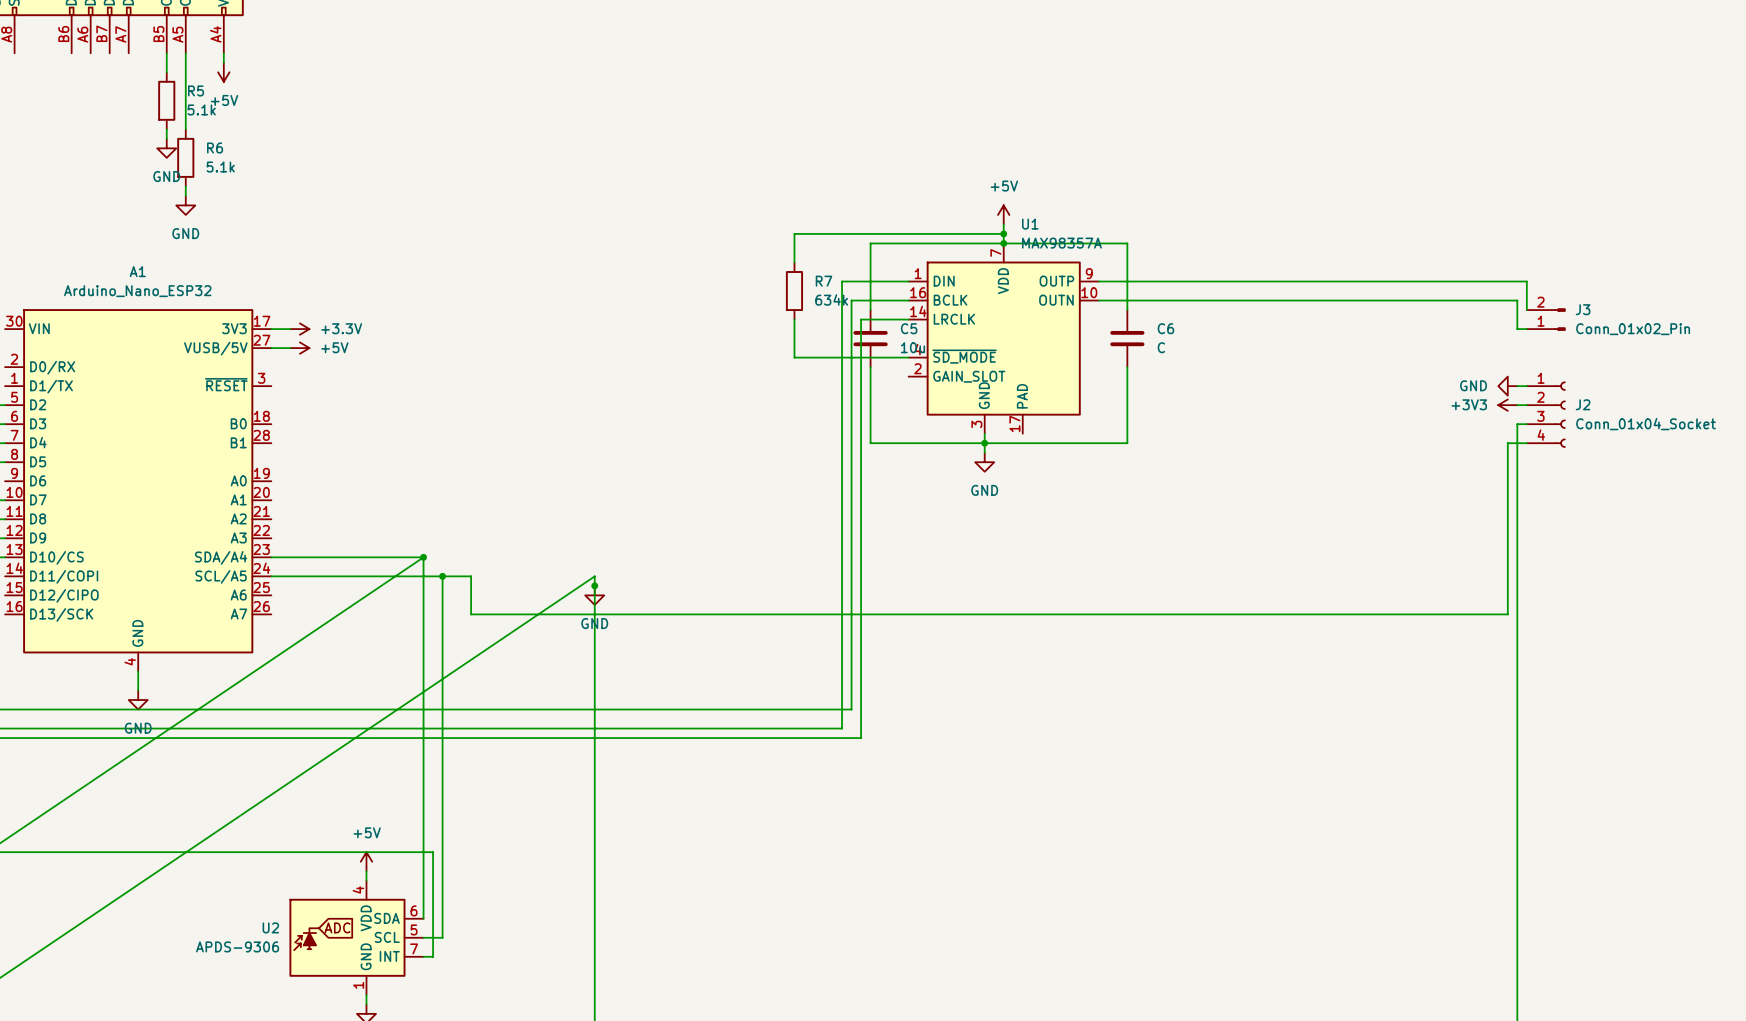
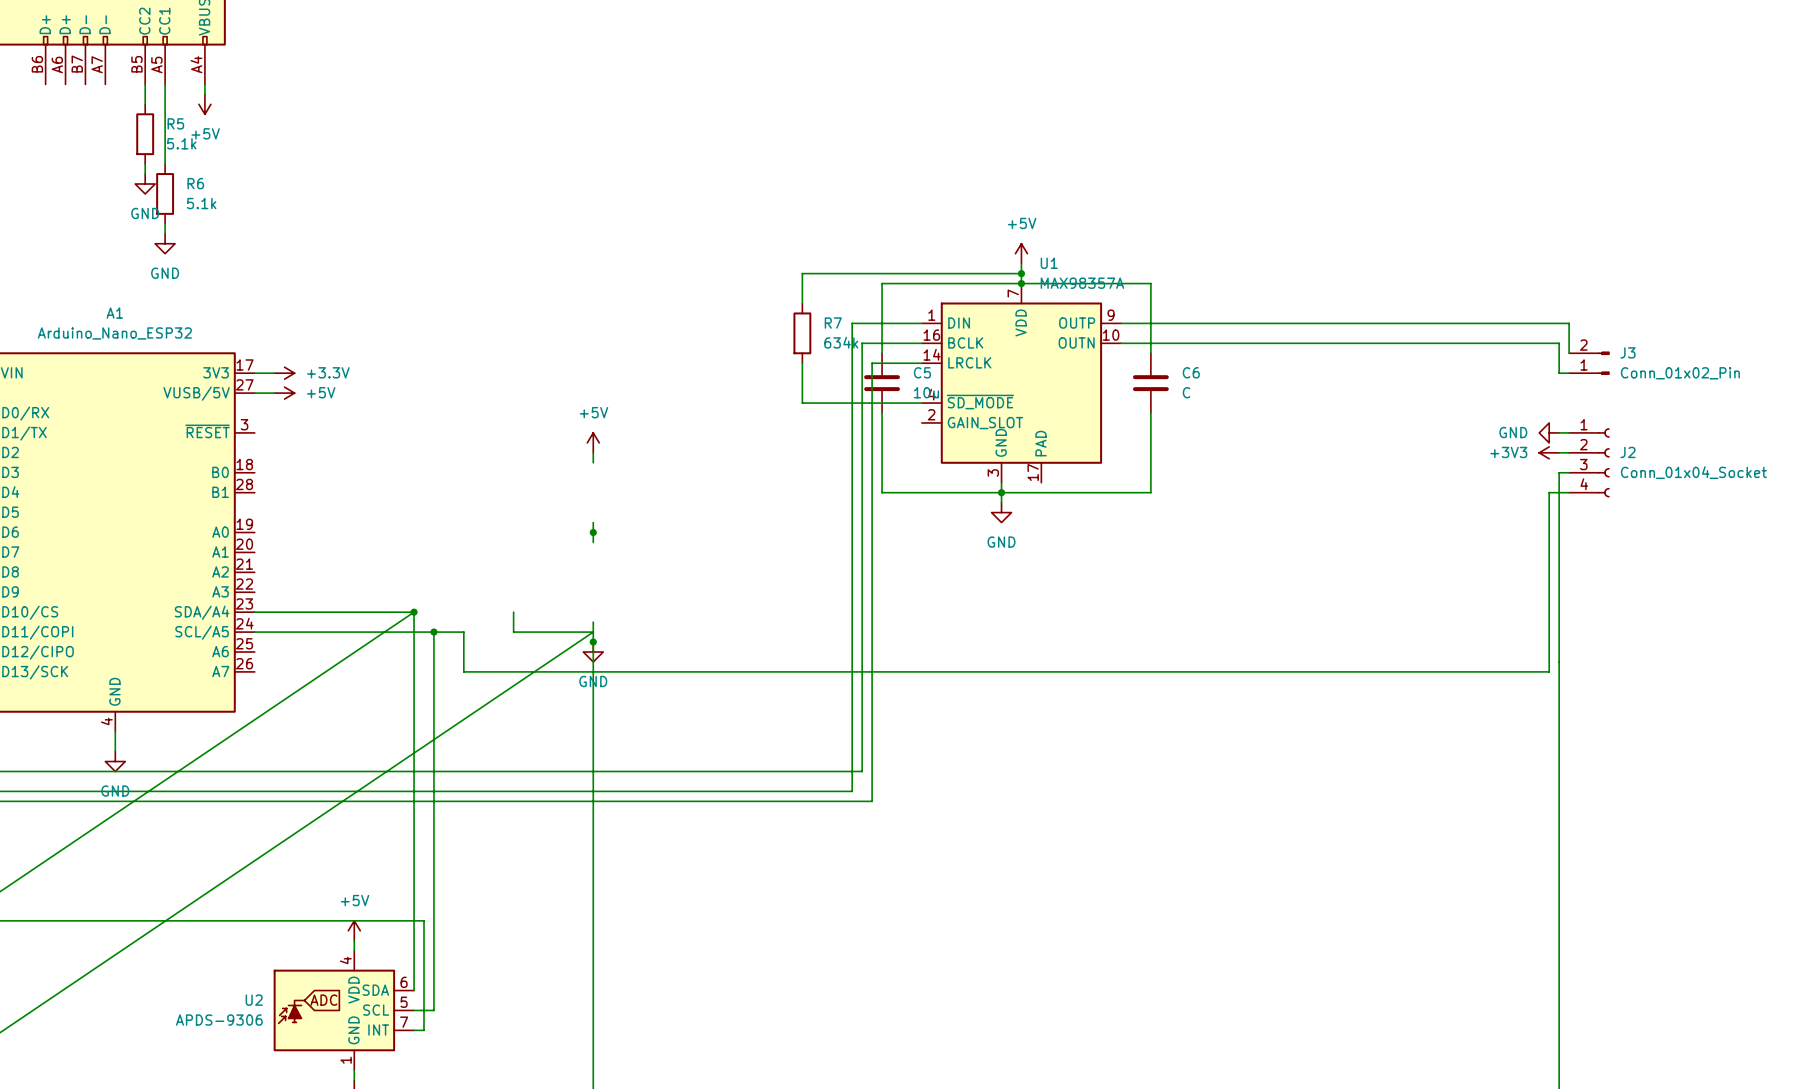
power symbol: none -> +5V (593, 442)
wire: none -> (593, 452) (593, 462)
wire: none -> (593, 522) (593, 542)
junction: none -> (593, 532)
wire: none -> (513, 612) (513, 632) (593, 632) (593, 622)

